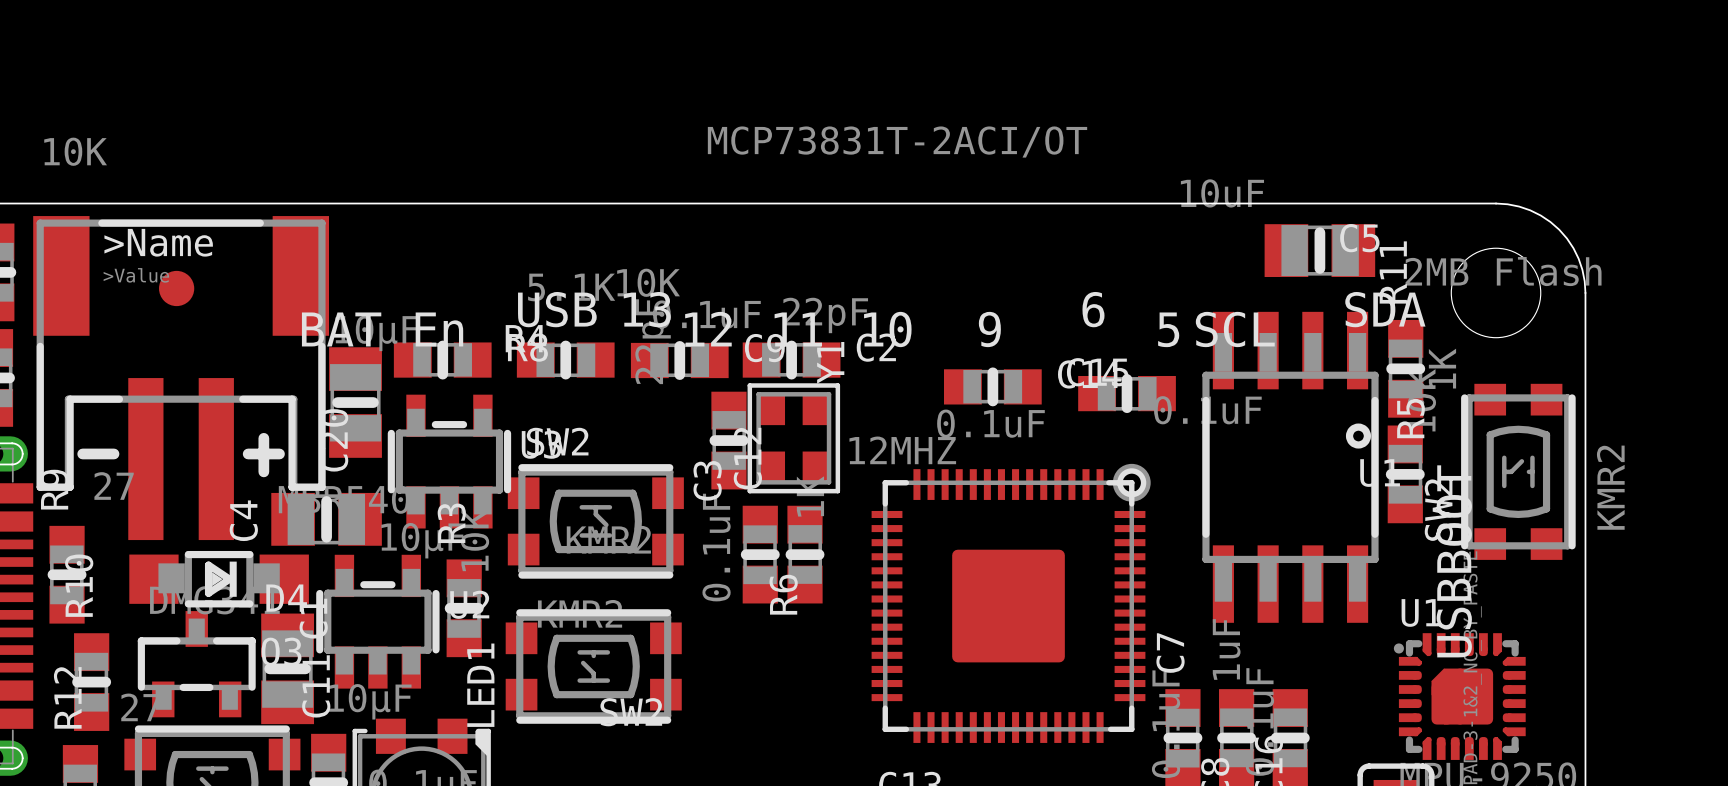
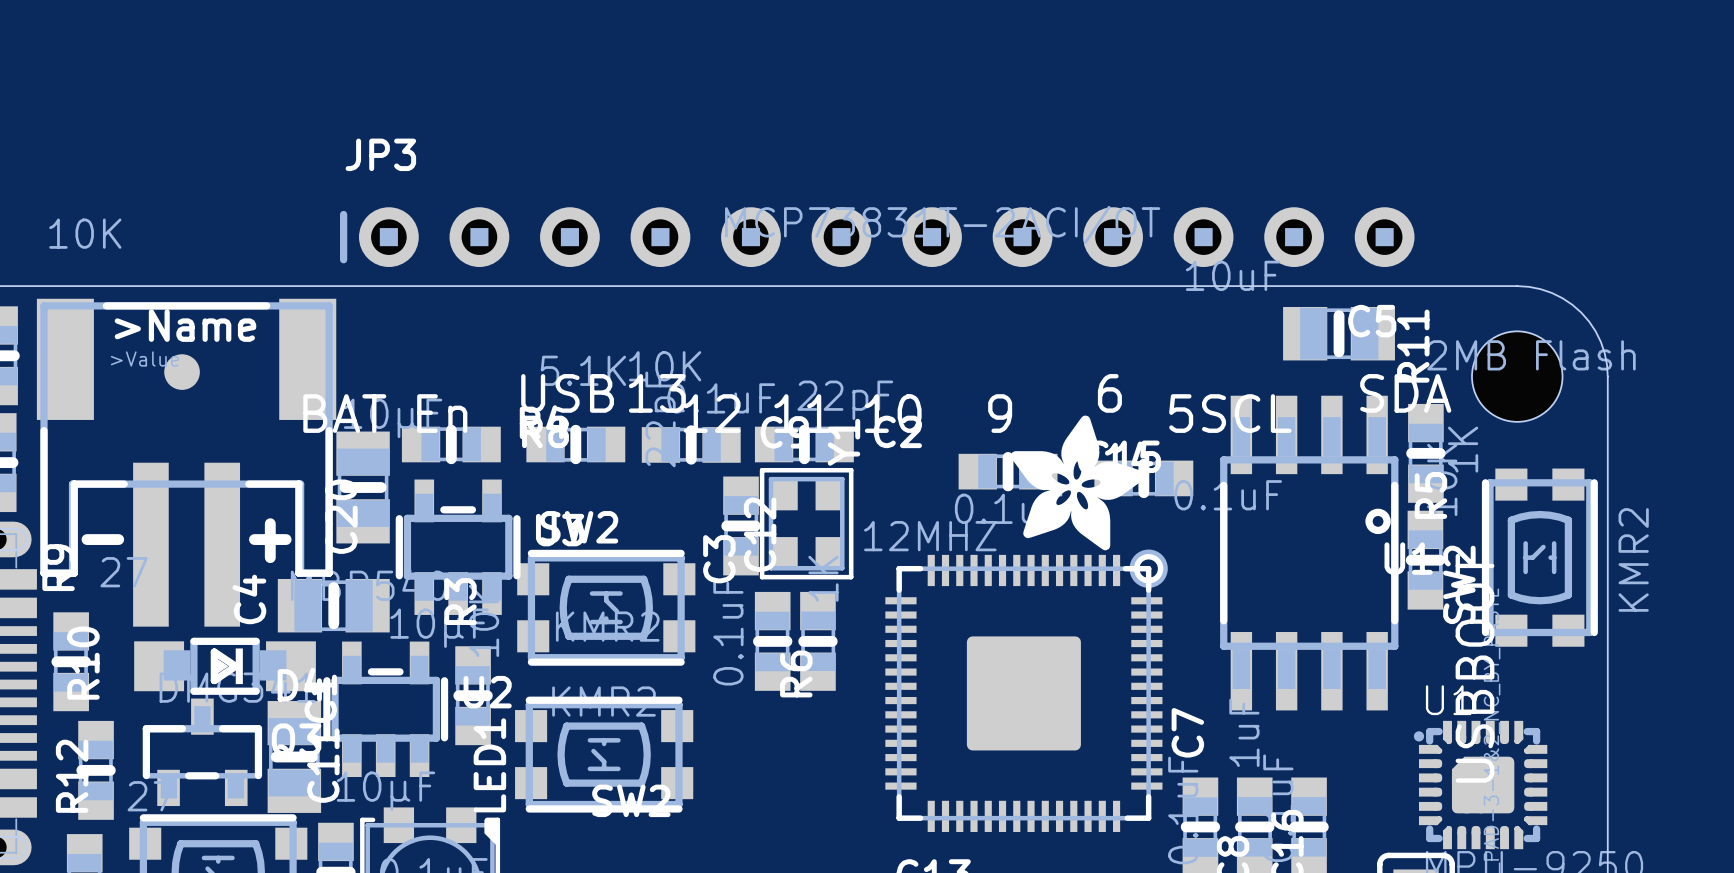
JP3: none -> (877, 237)
drawing: none -> [1010, 415, 1146, 551]

